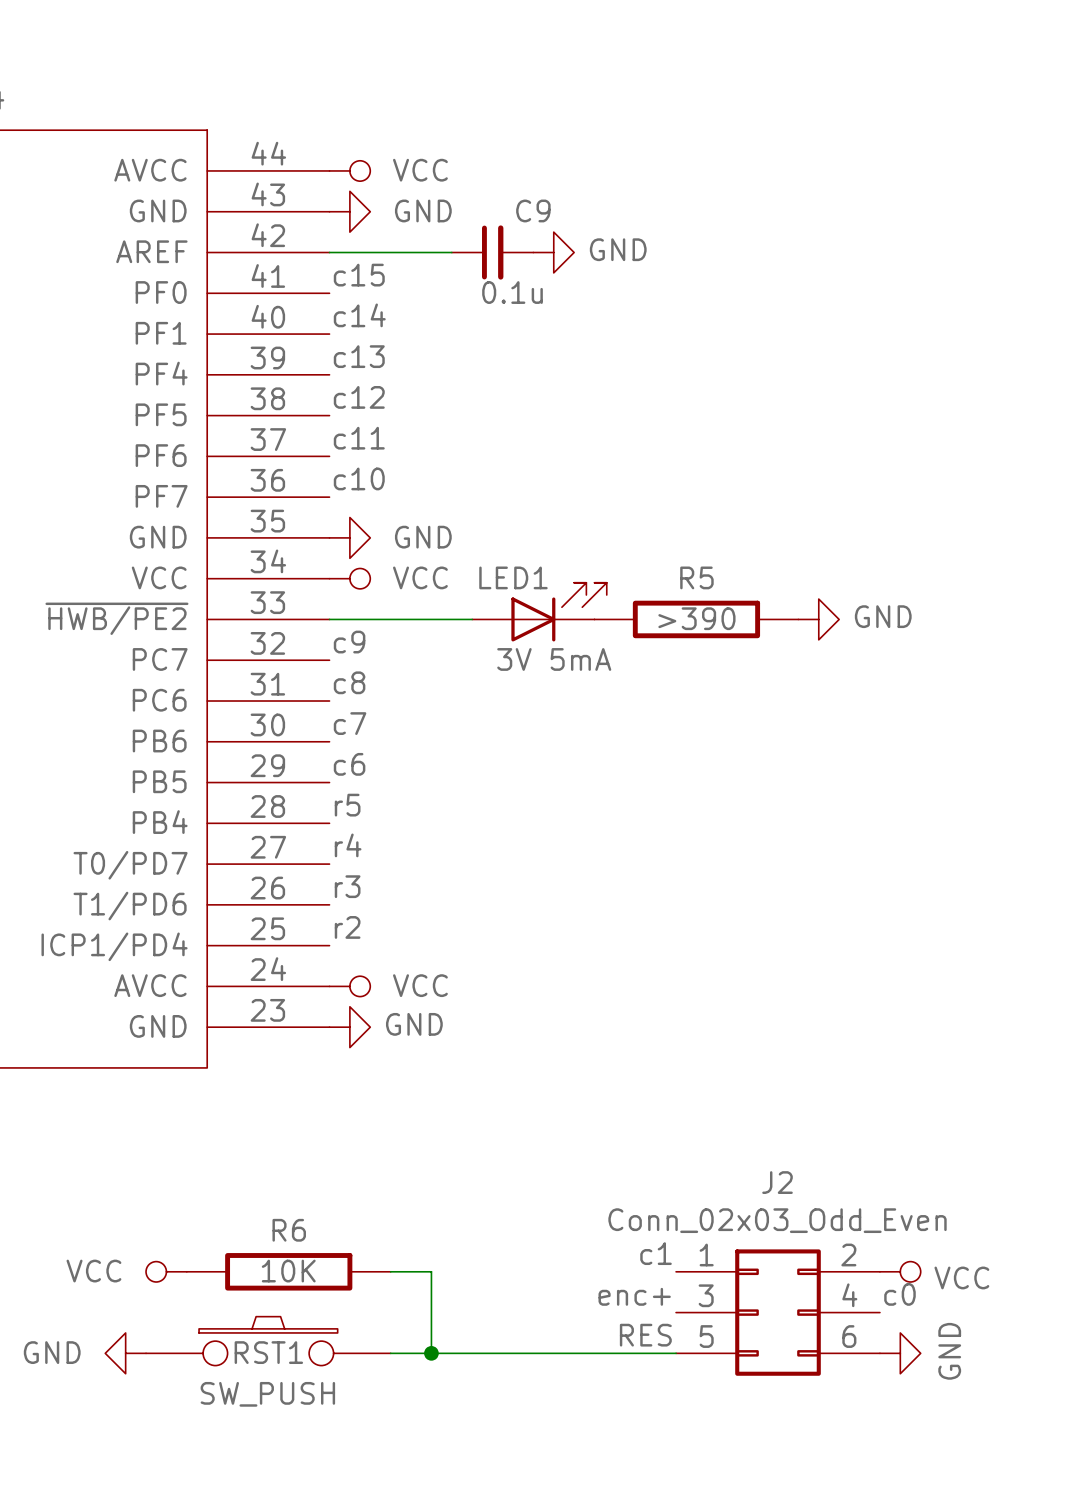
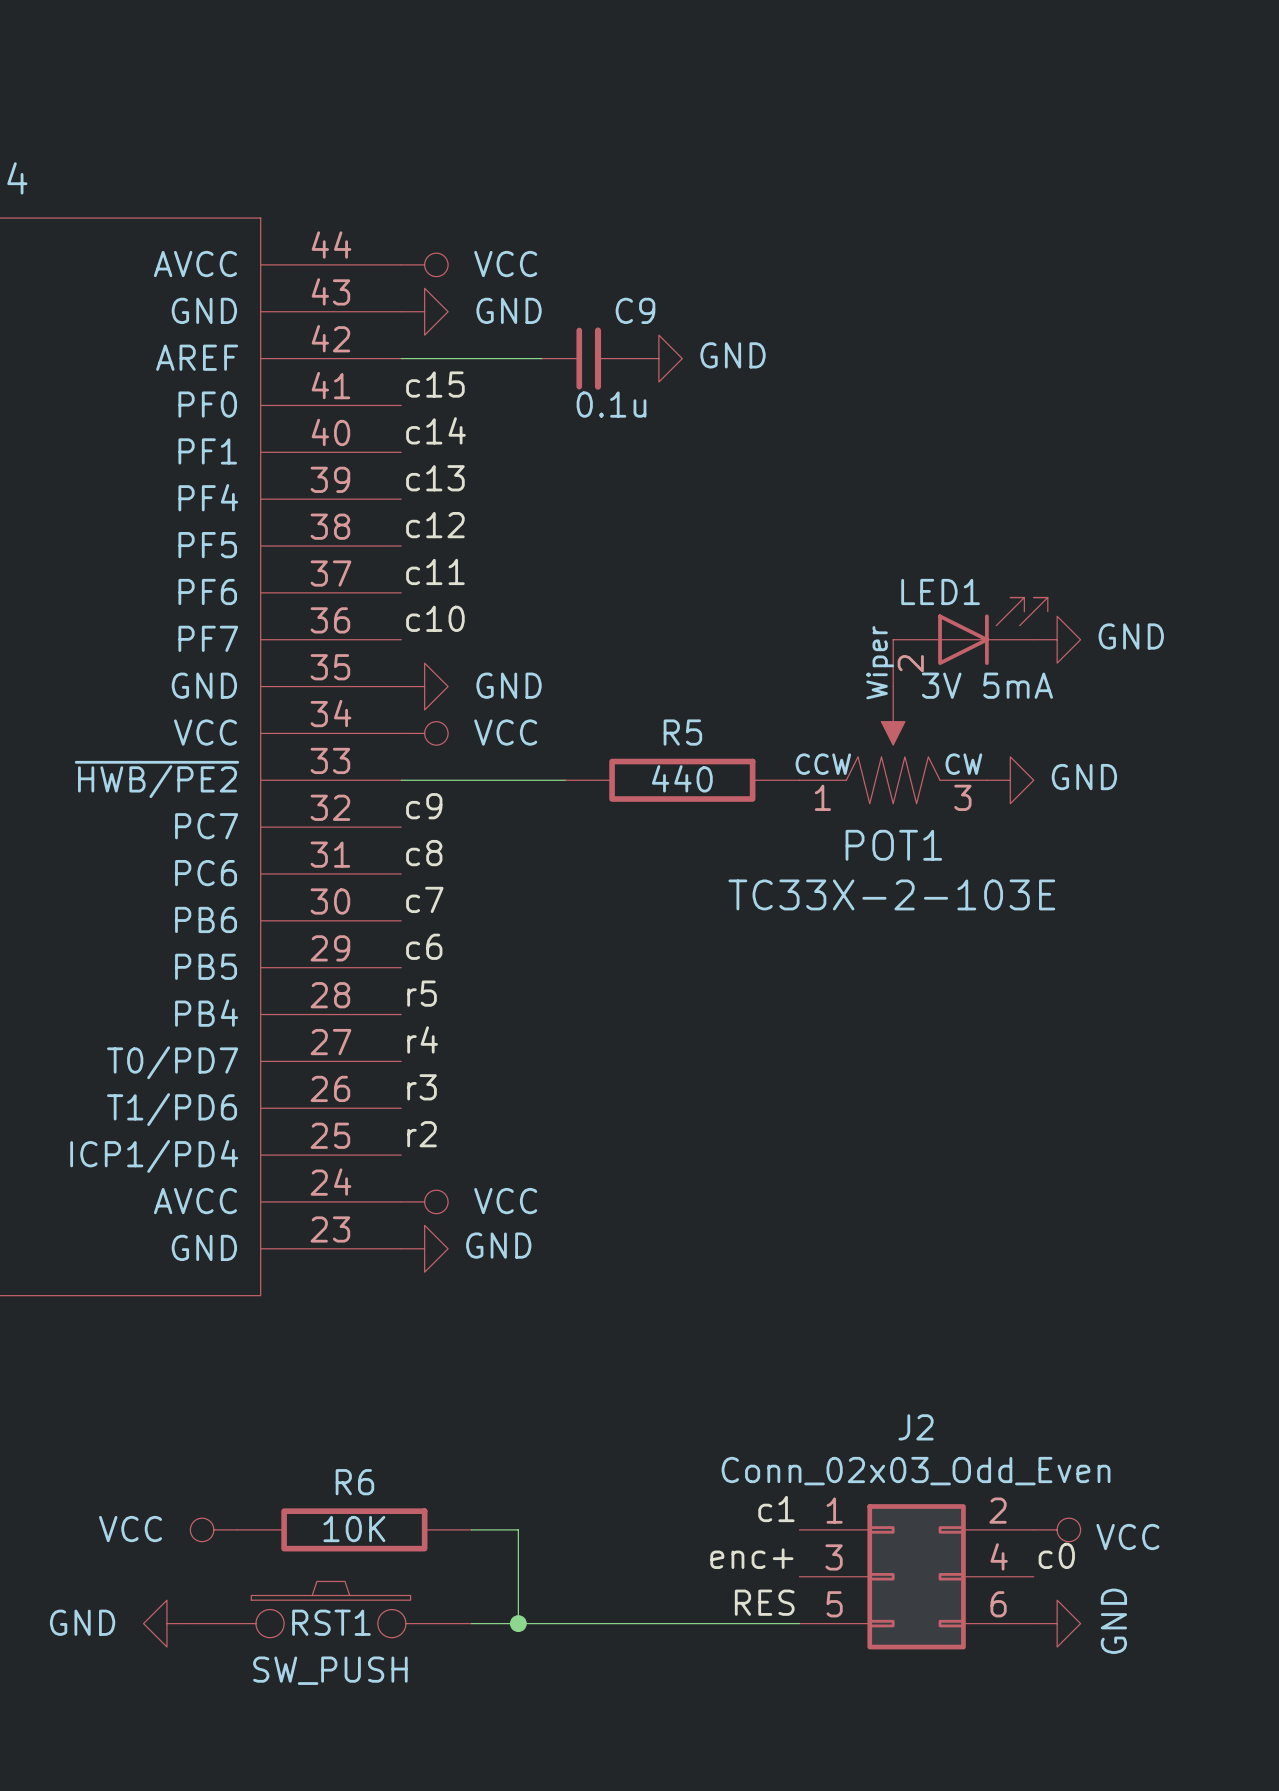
power symbol: none -> GND (1057, 639)
POT1: none -> TC33X-2-103E (893, 721)
LED1 position: (539, 612) -> (970, 631)
R5 value: >390 (696, 618) -> 440 (682, 778)
R5 position: (696, 619) -> (682, 780)
power symbol position: GND (818, 619) -> GND (1010, 780)

